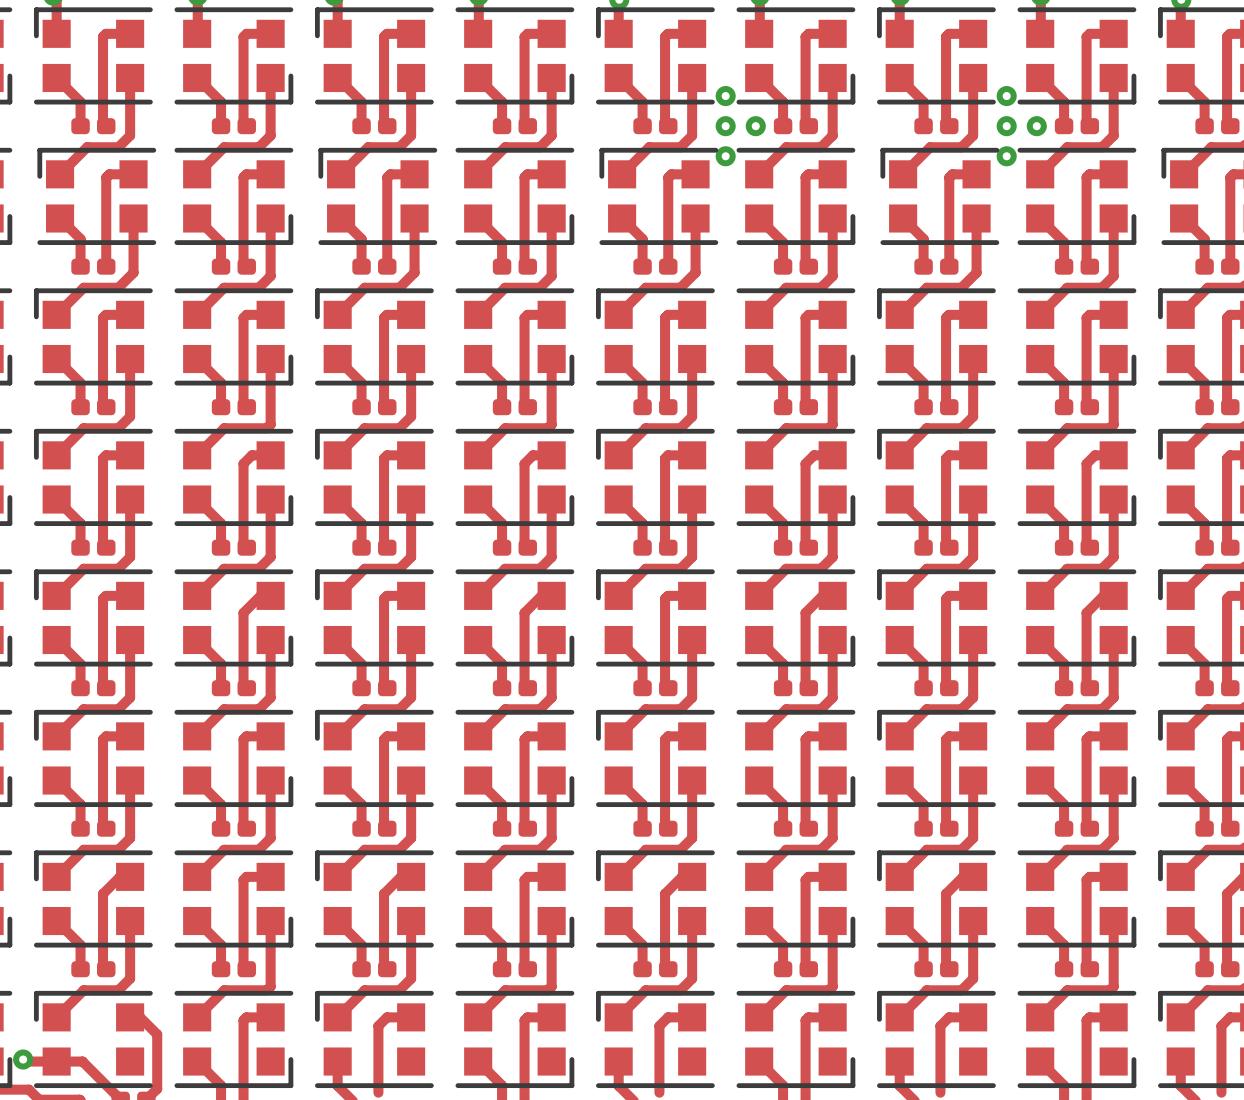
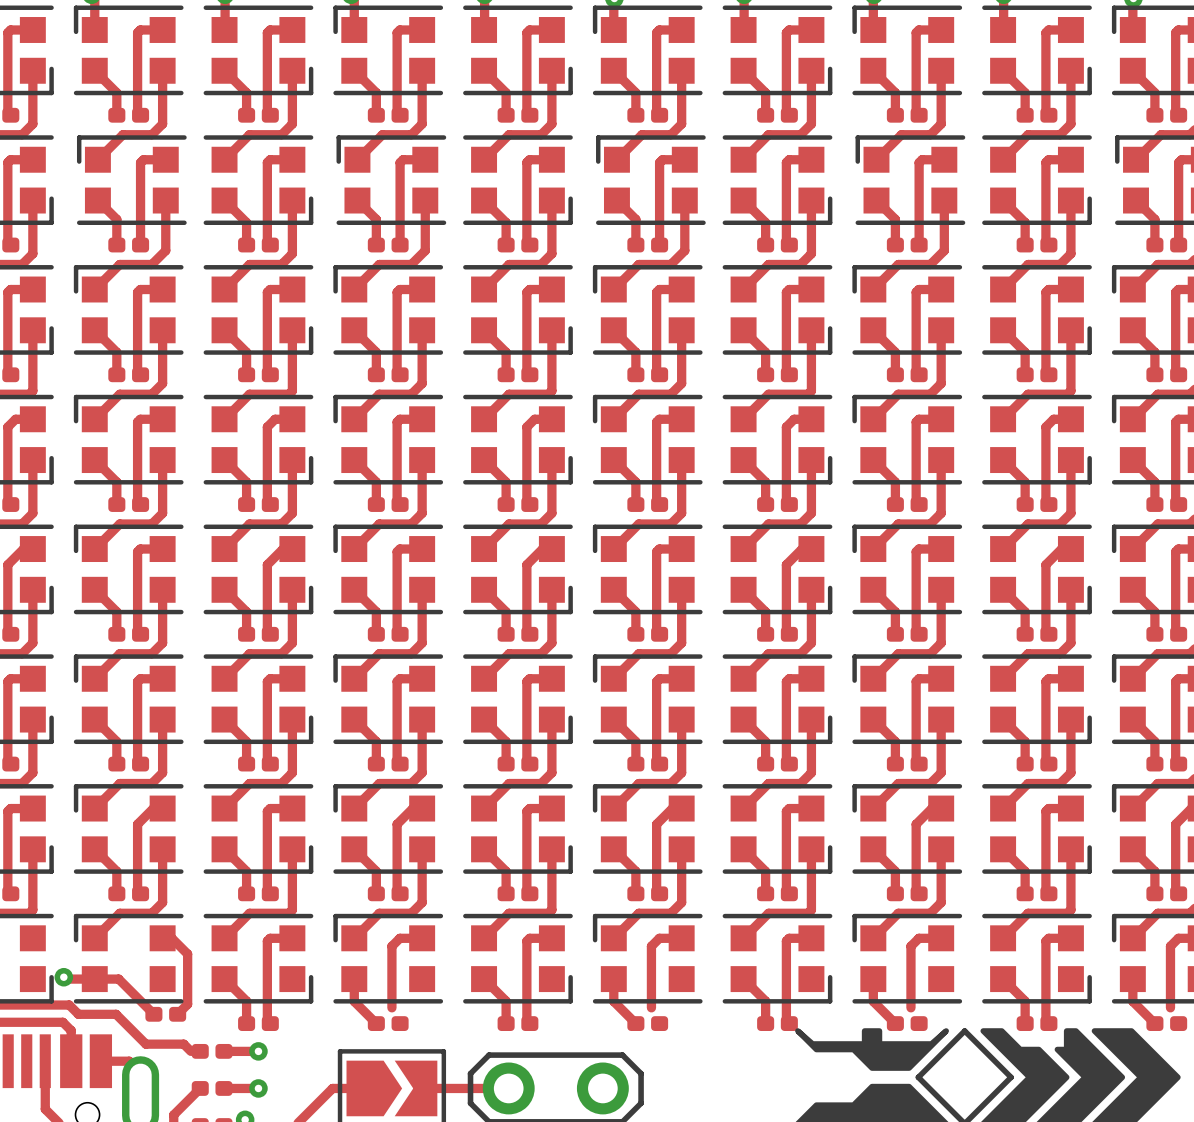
via: (725, 96) -> none
via: (1006, 96) -> none
via: (725, 126) -> none
via: (755, 126) -> none
via: (1006, 126) -> none
via: (1036, 126) -> none
via: (725, 156) -> none
via: (1006, 156) -> none

